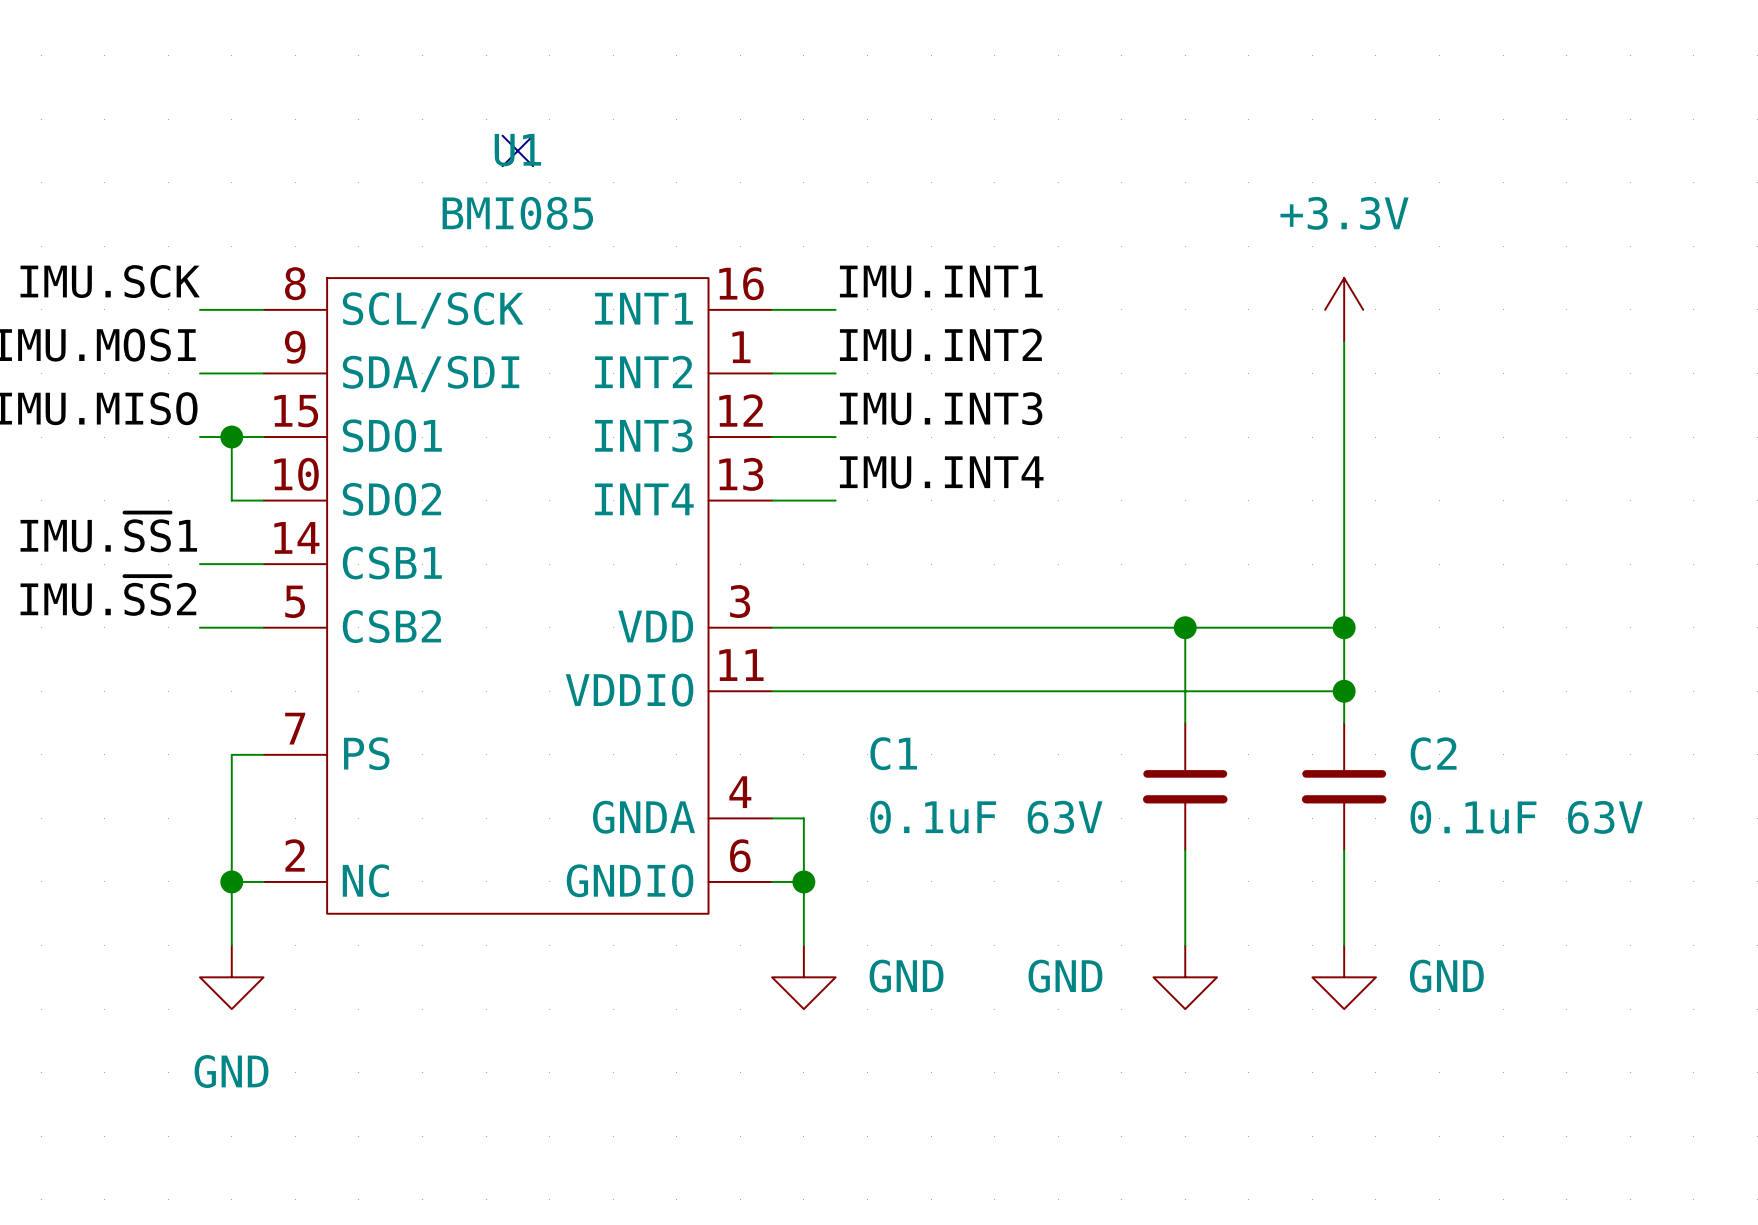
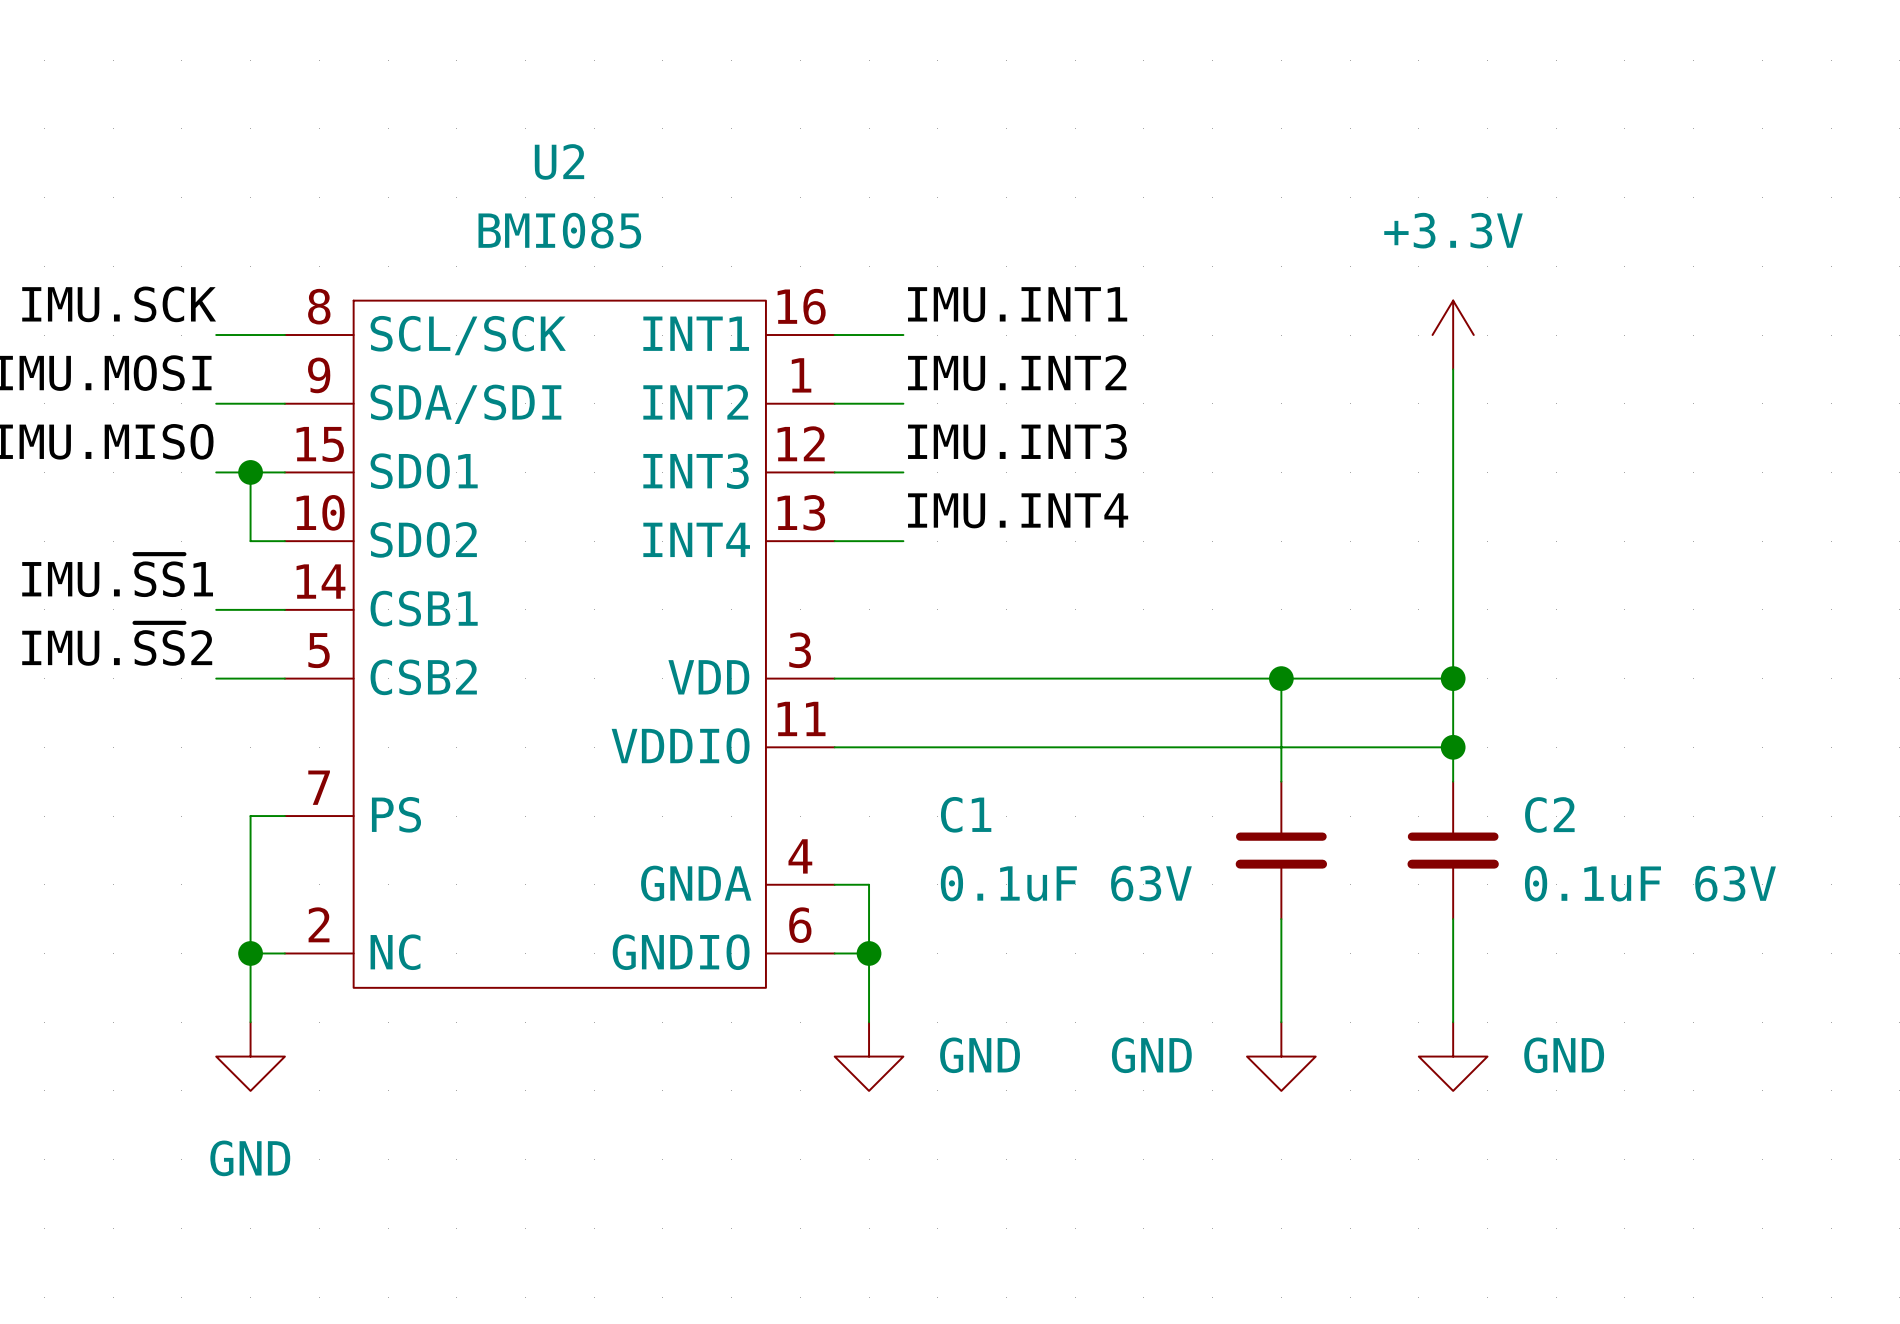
no-connect mark: (517, 150) -> none
U1 name: U1 (517, 150) -> U2 (559, 161)

